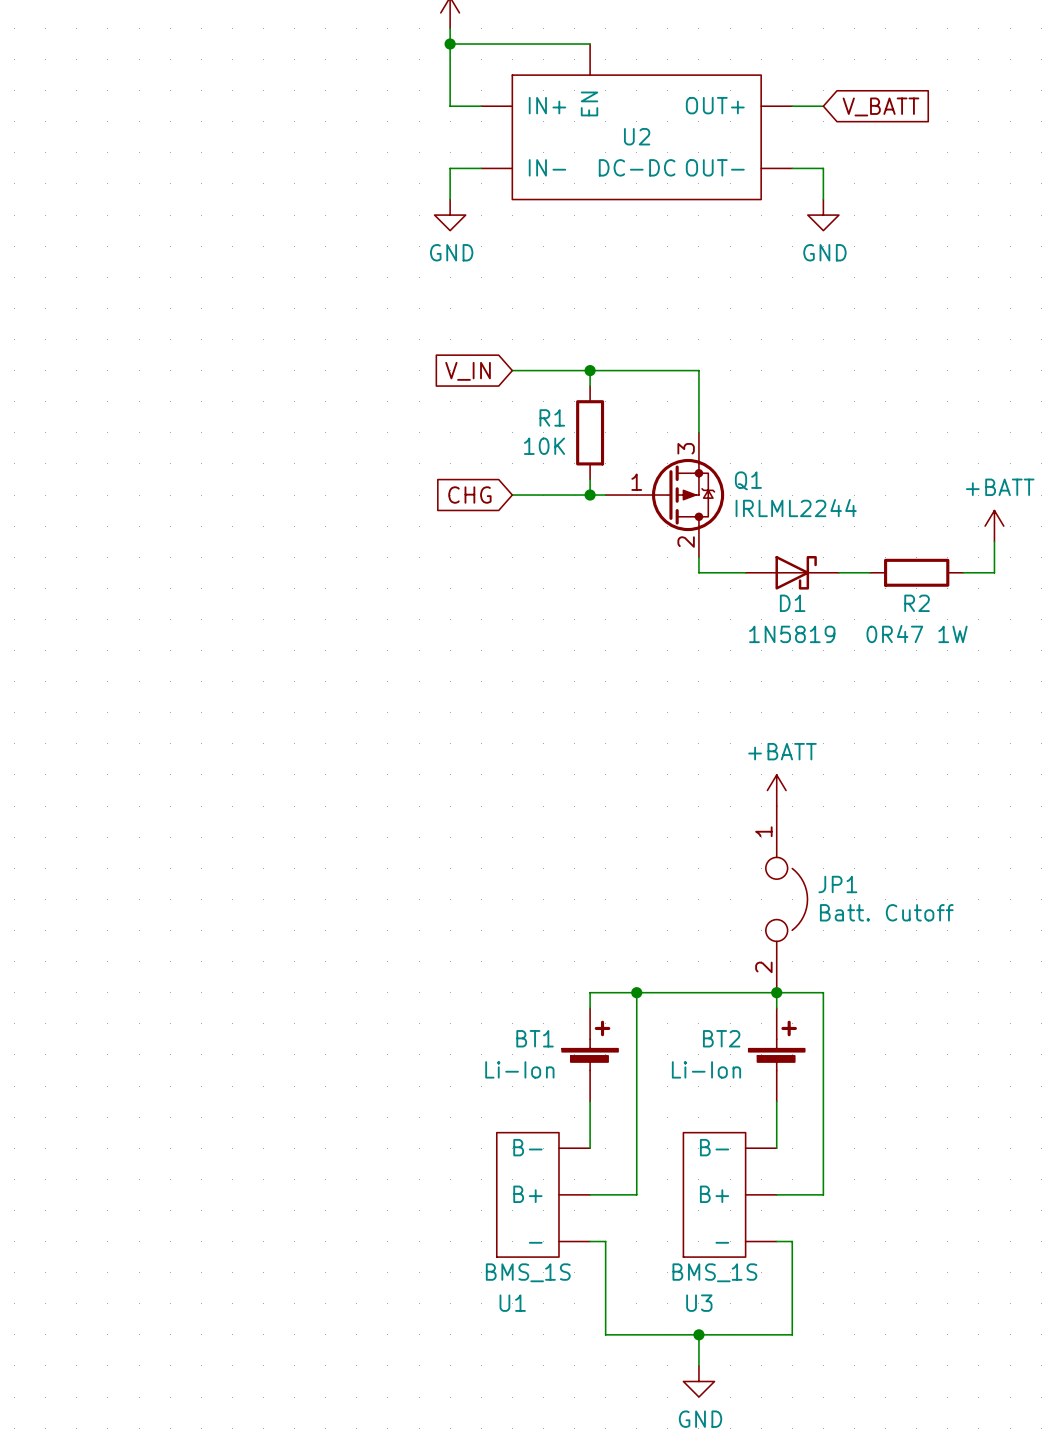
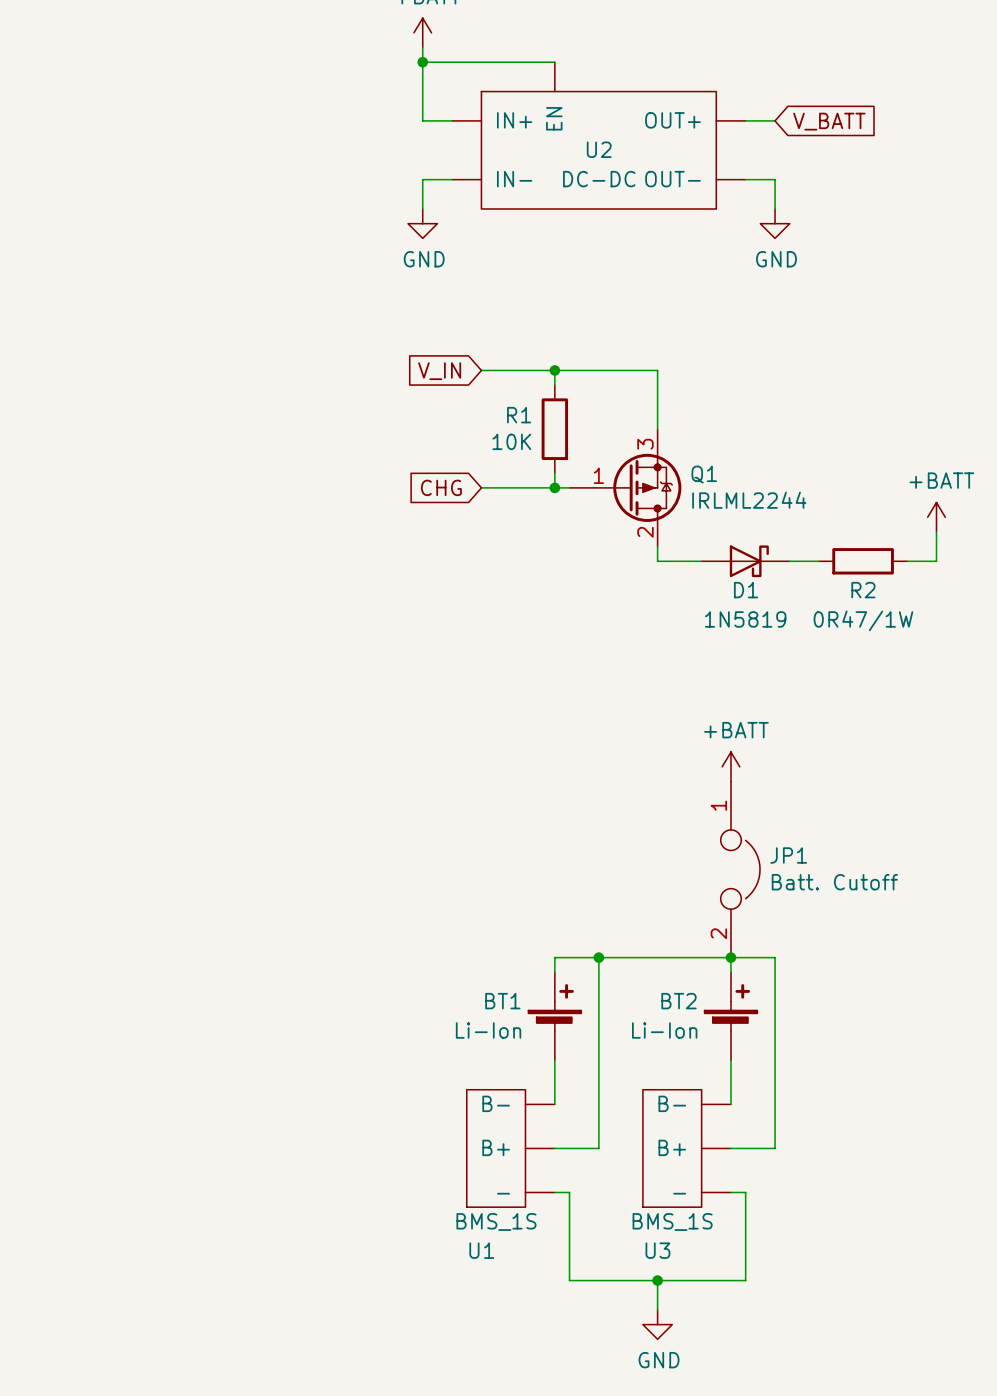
R2 value: 0R47 1W (917, 634) -> 0R47/1W (863, 620)

